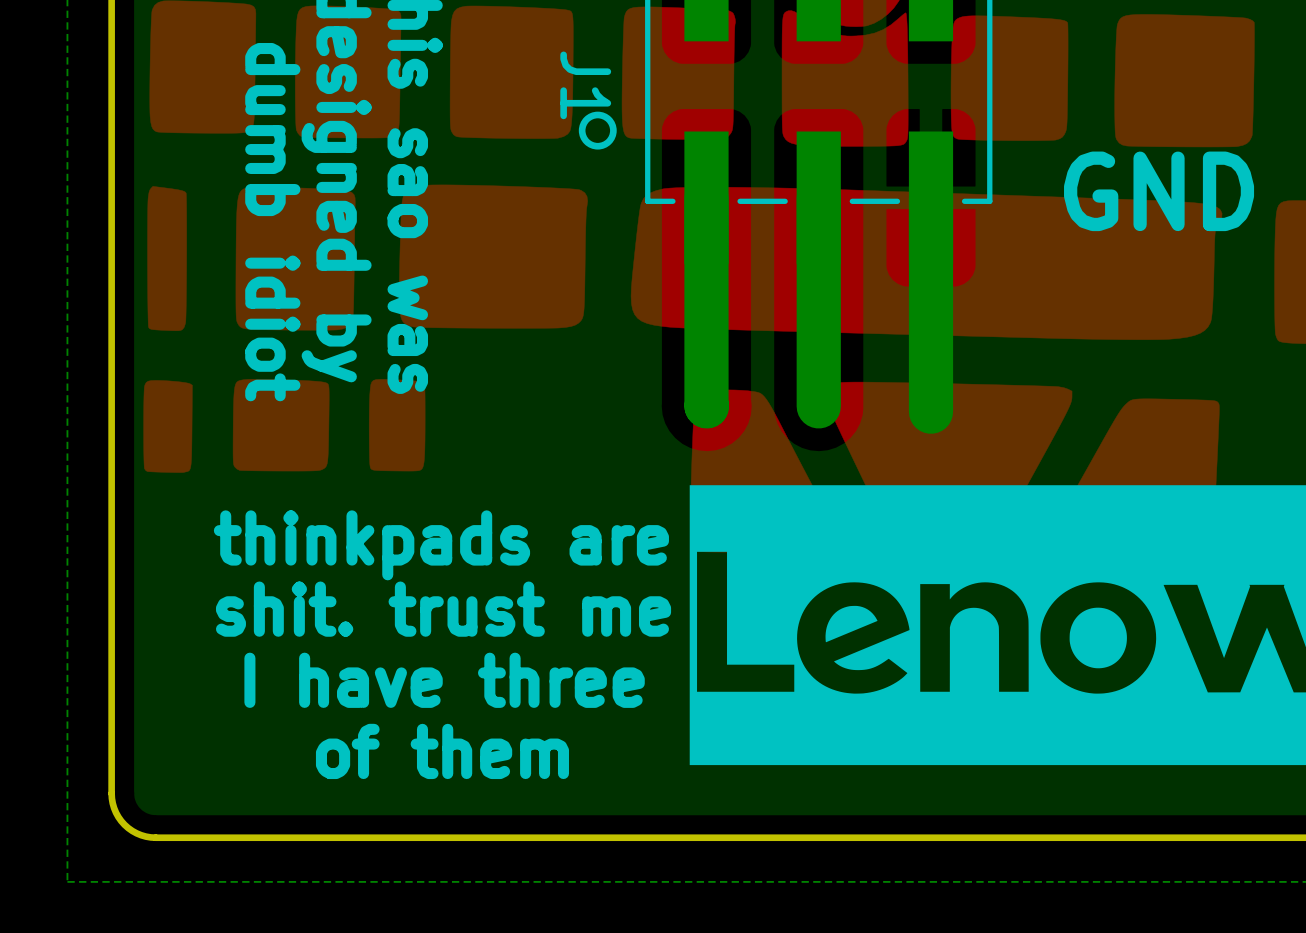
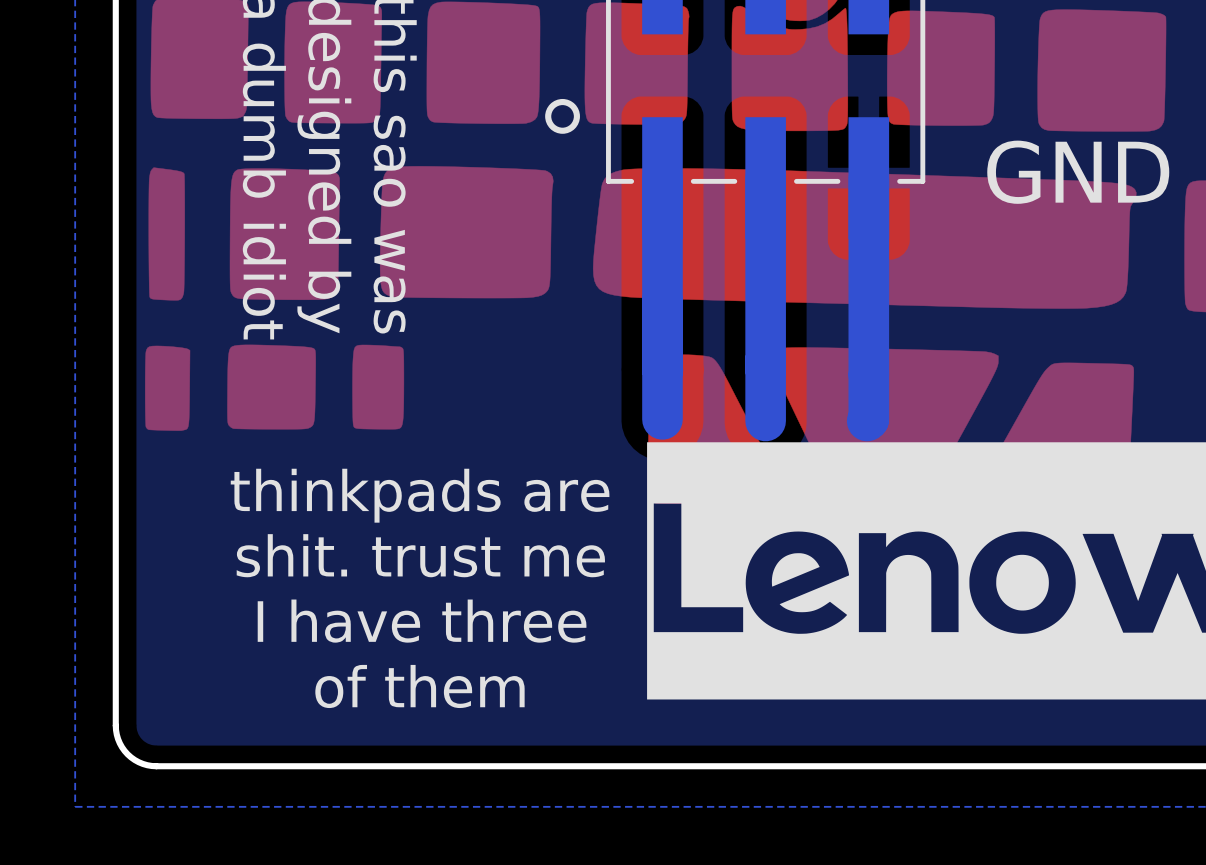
J1 name: J1 (585, 85) -> none
bottom track: none -> (662, 369) (662, 419)
bottom track: none -> (765, 369) (765, 421)
bottom track: none -> (868, 374) (868, 419) (867, 421)

